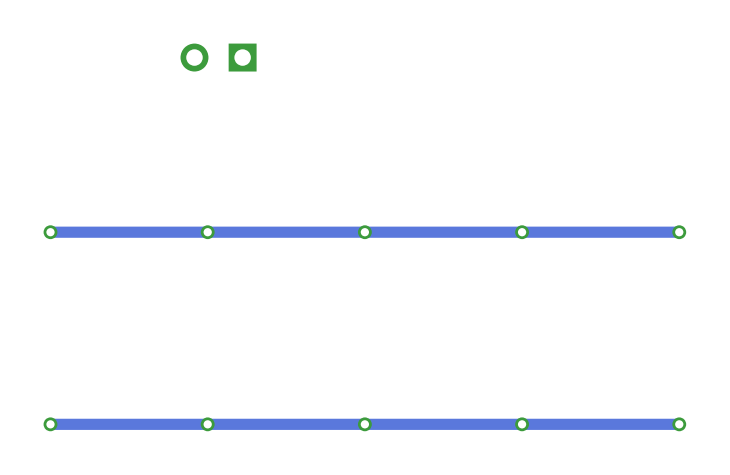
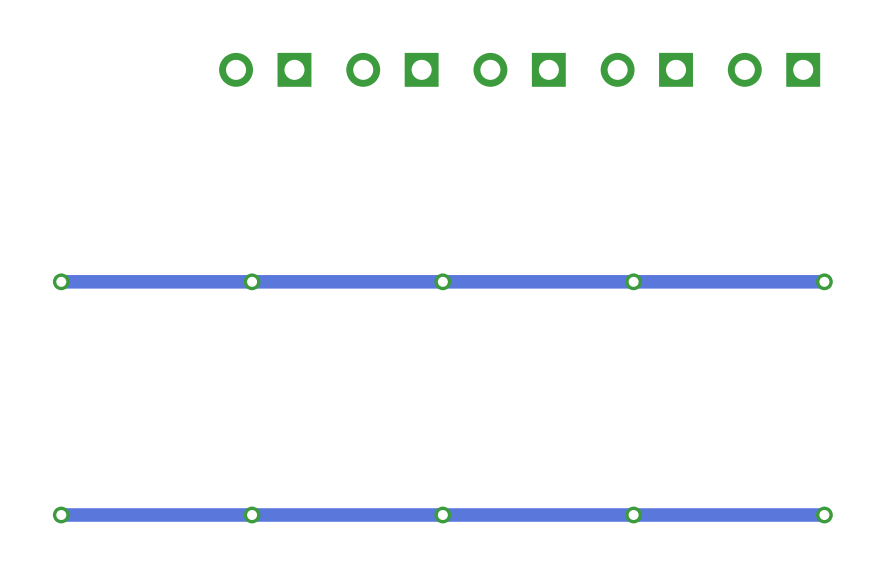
part: none -> (392, 69)
part: none -> (519, 69)
part: none -> (646, 69)
part: none -> (774, 69)

